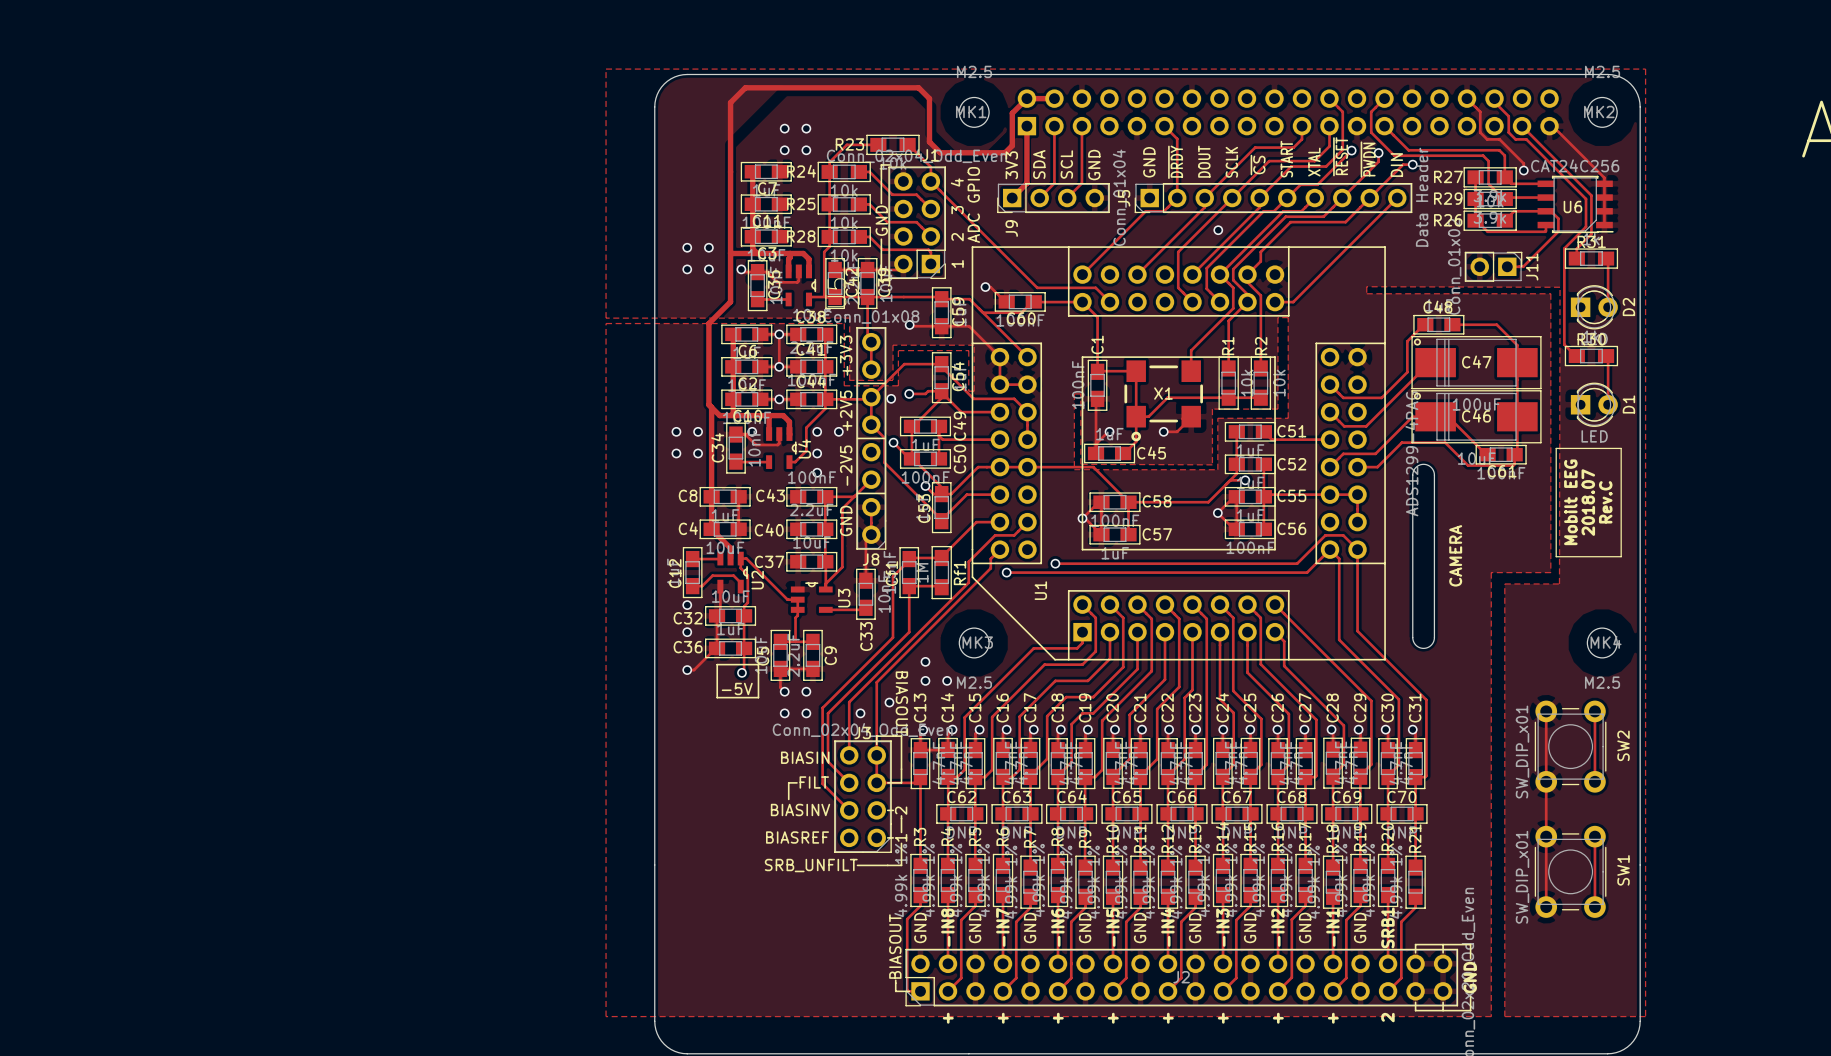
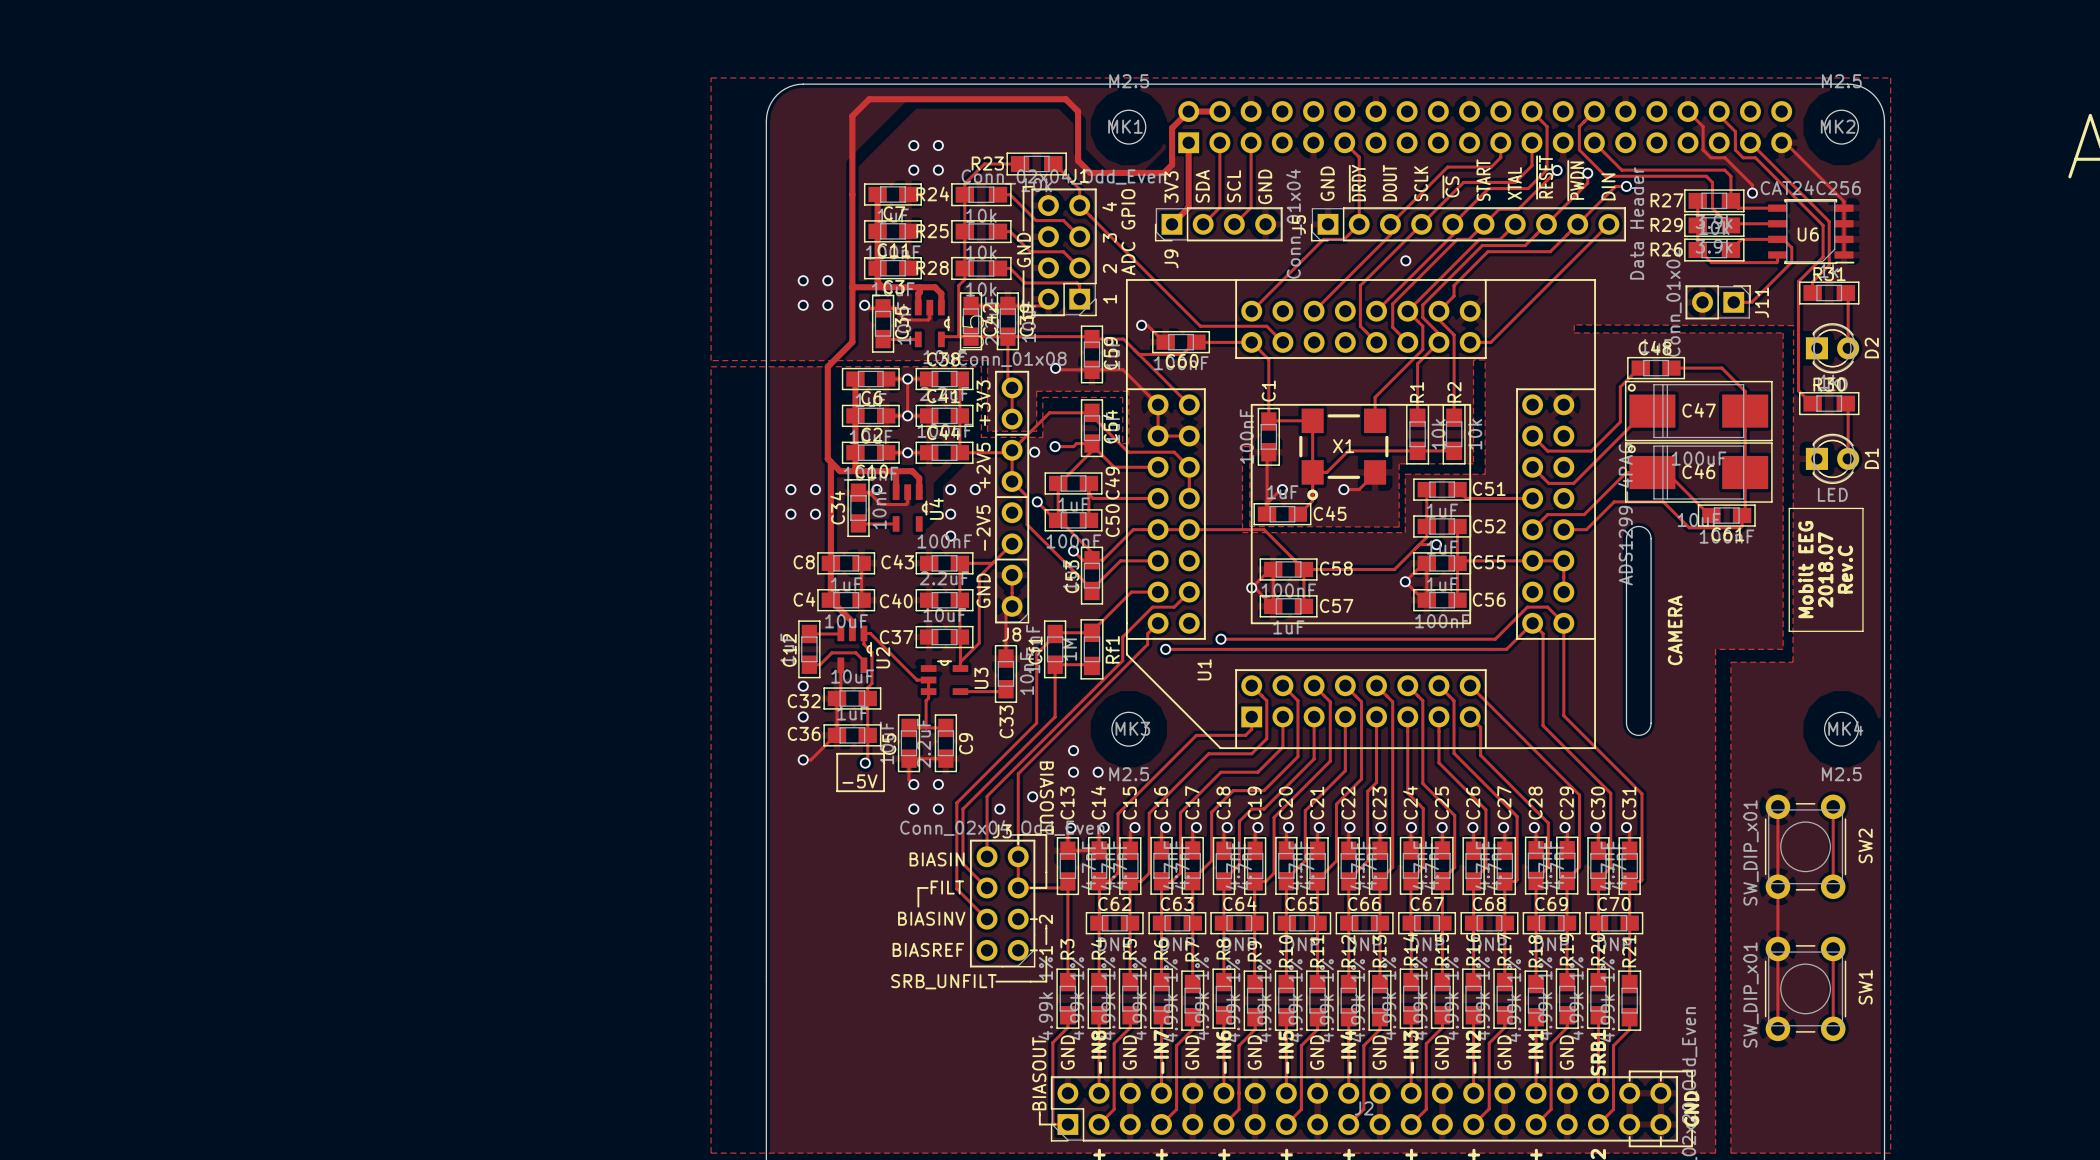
track: (825, 399) (825, 408) (806, 427) (806, 450) (795, 462) (789, 462) -> none

